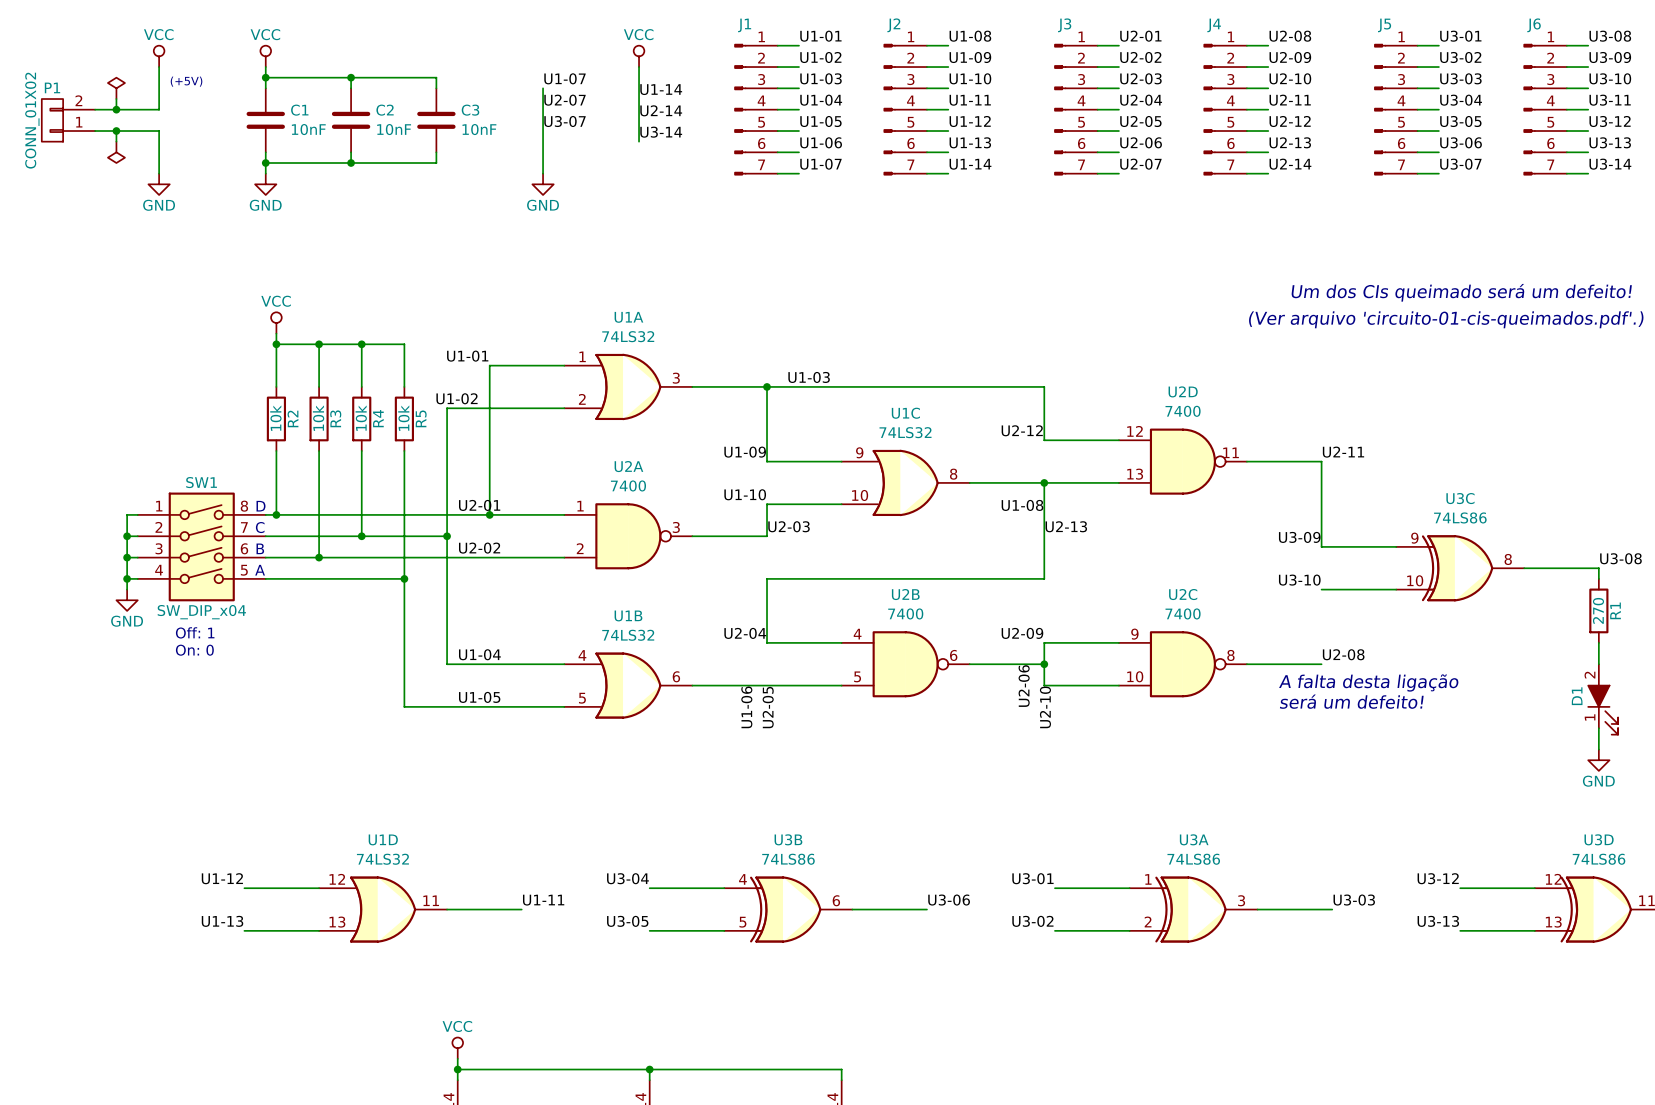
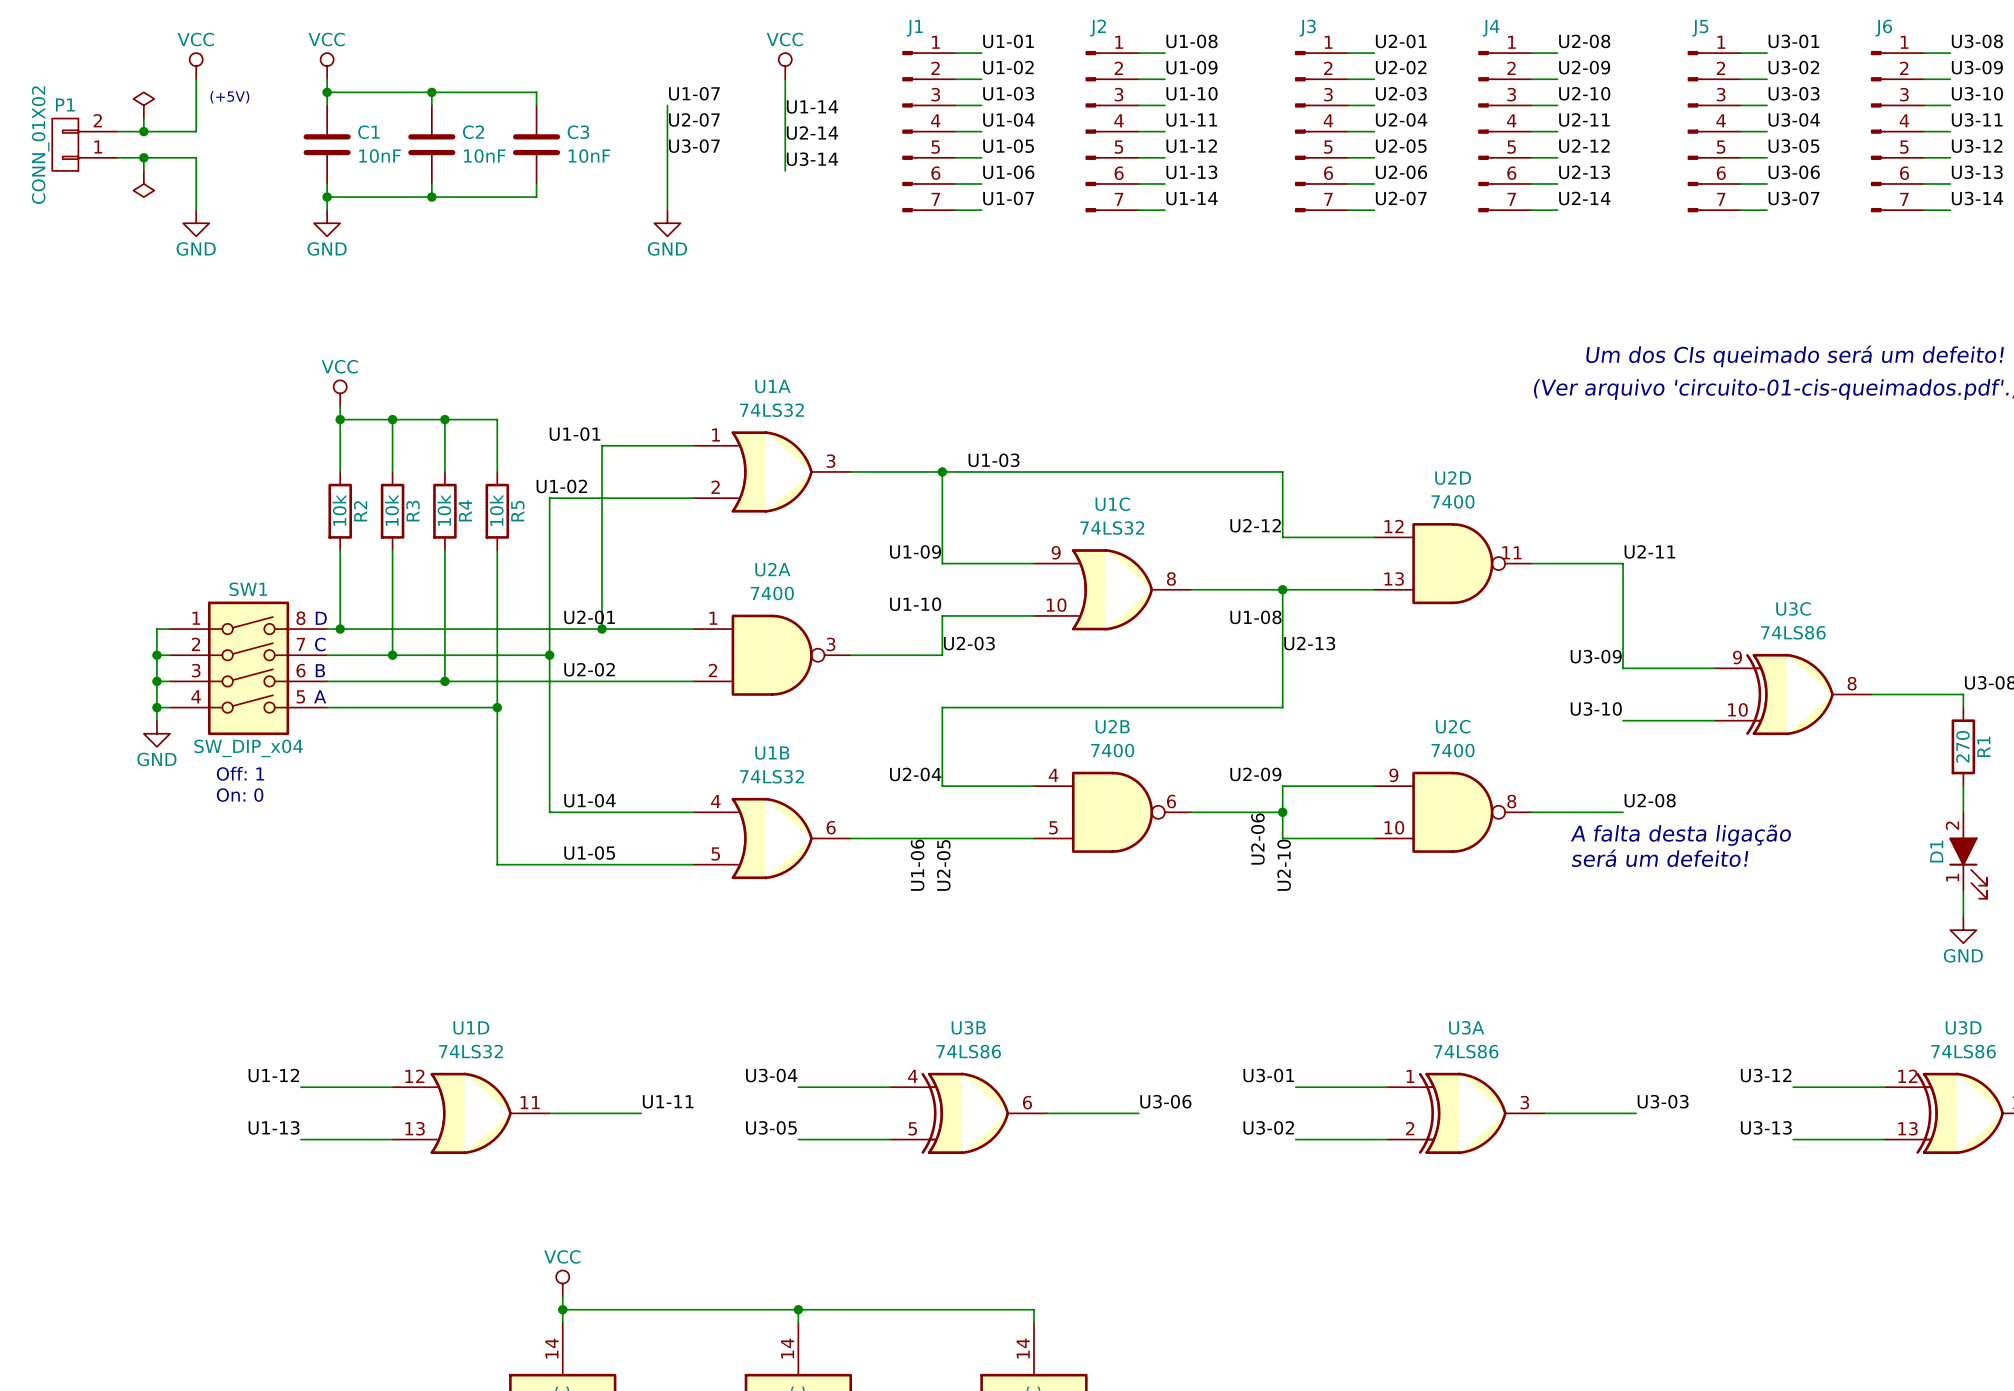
wire: (319, 536) (319, 557) -> (444, 655) (444, 681)
junction: none -> (392, 655)
junction: (361, 536) -> none
junction: (319, 557) -> none
junction: none -> (444, 681)

